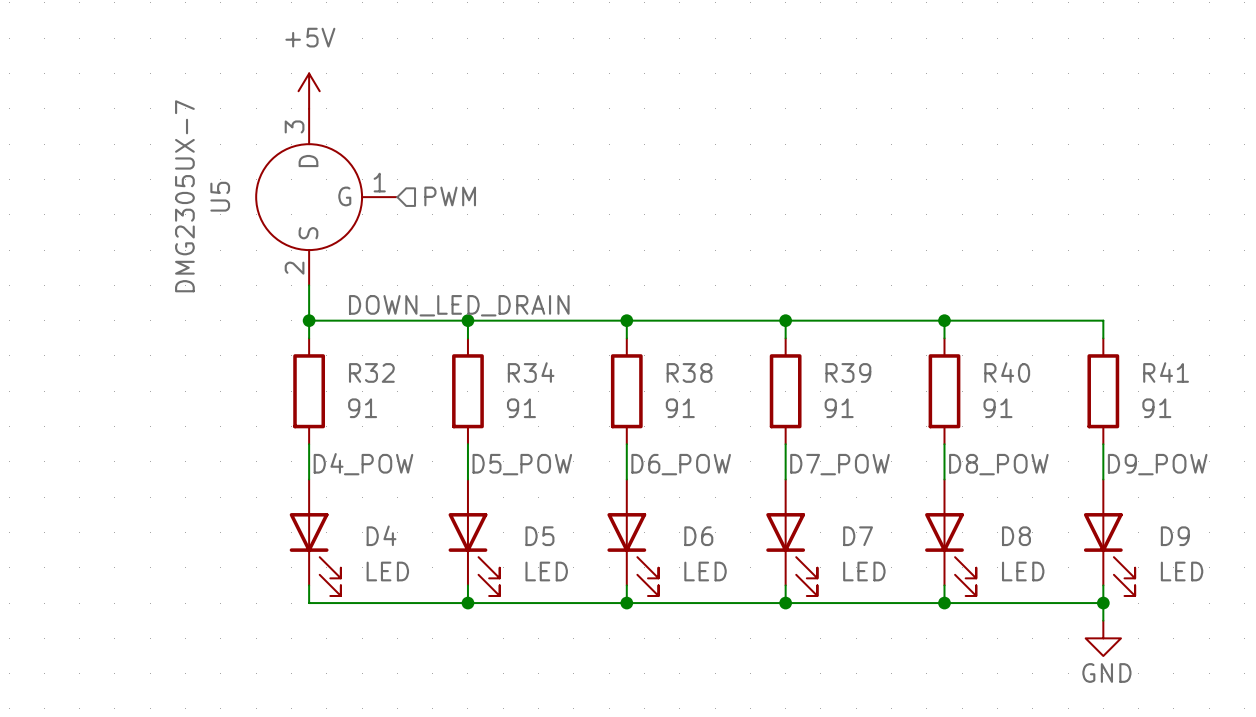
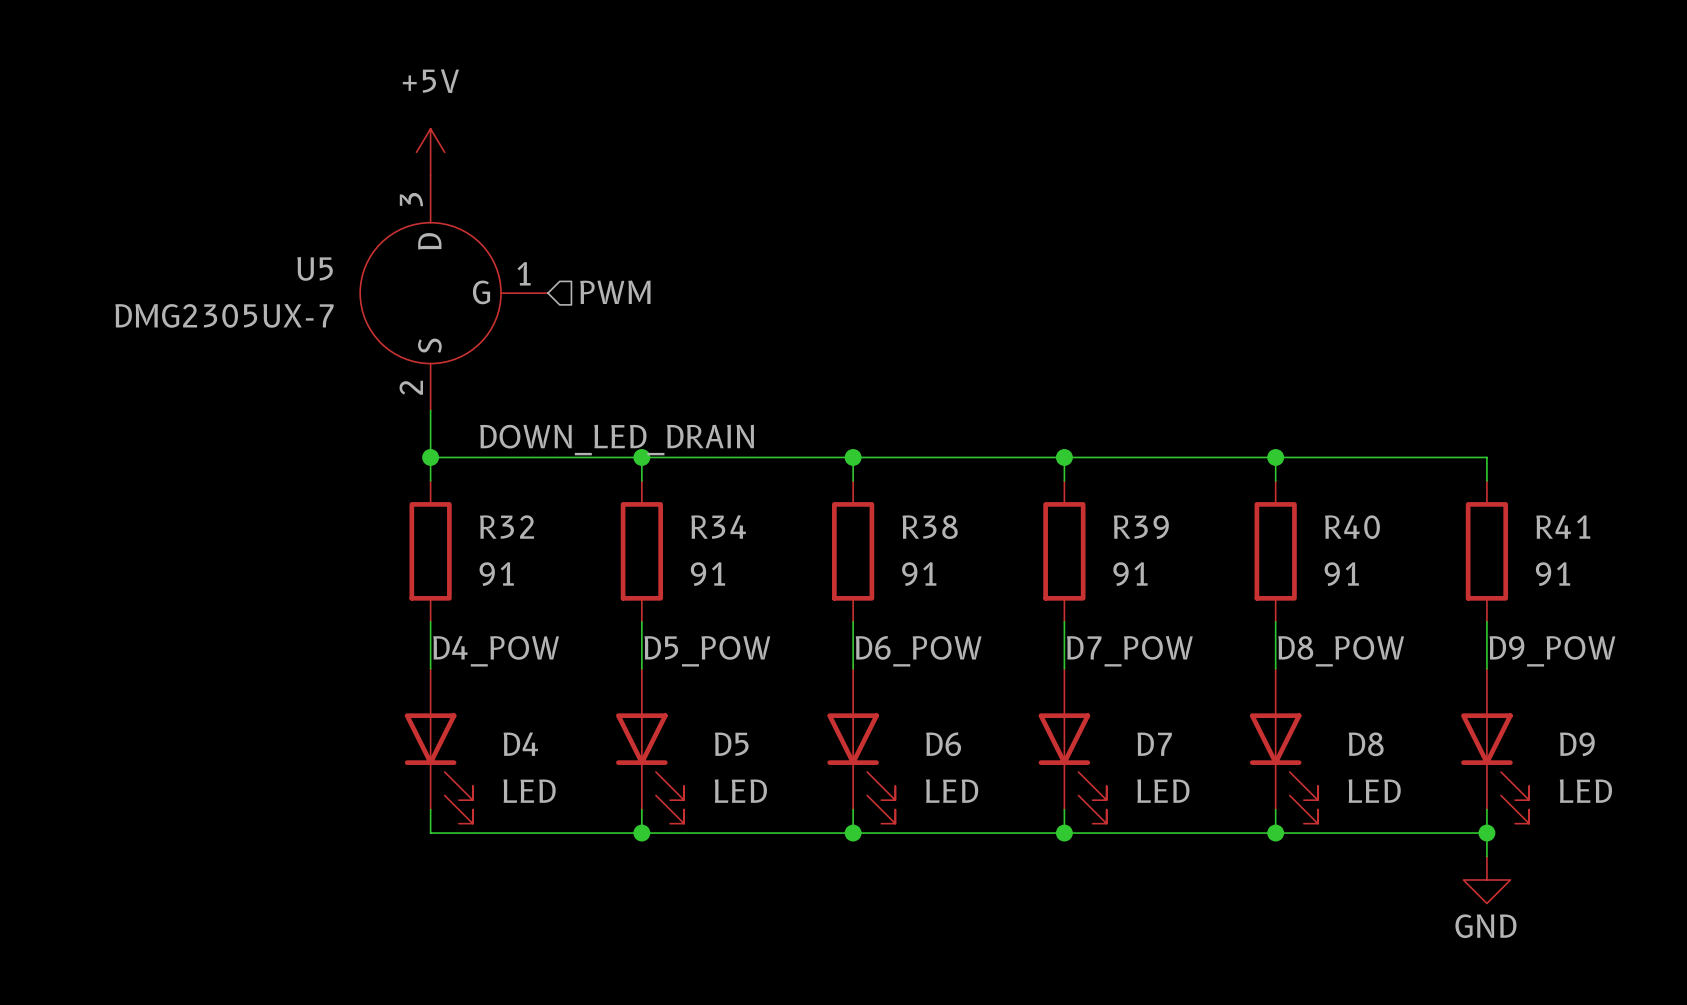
U5 value rotation: 0° (184, 196) -> 90° clockwise (224, 315)
U5 name rotation: 0° (220, 196) -> 90° clockwise (315, 268)

